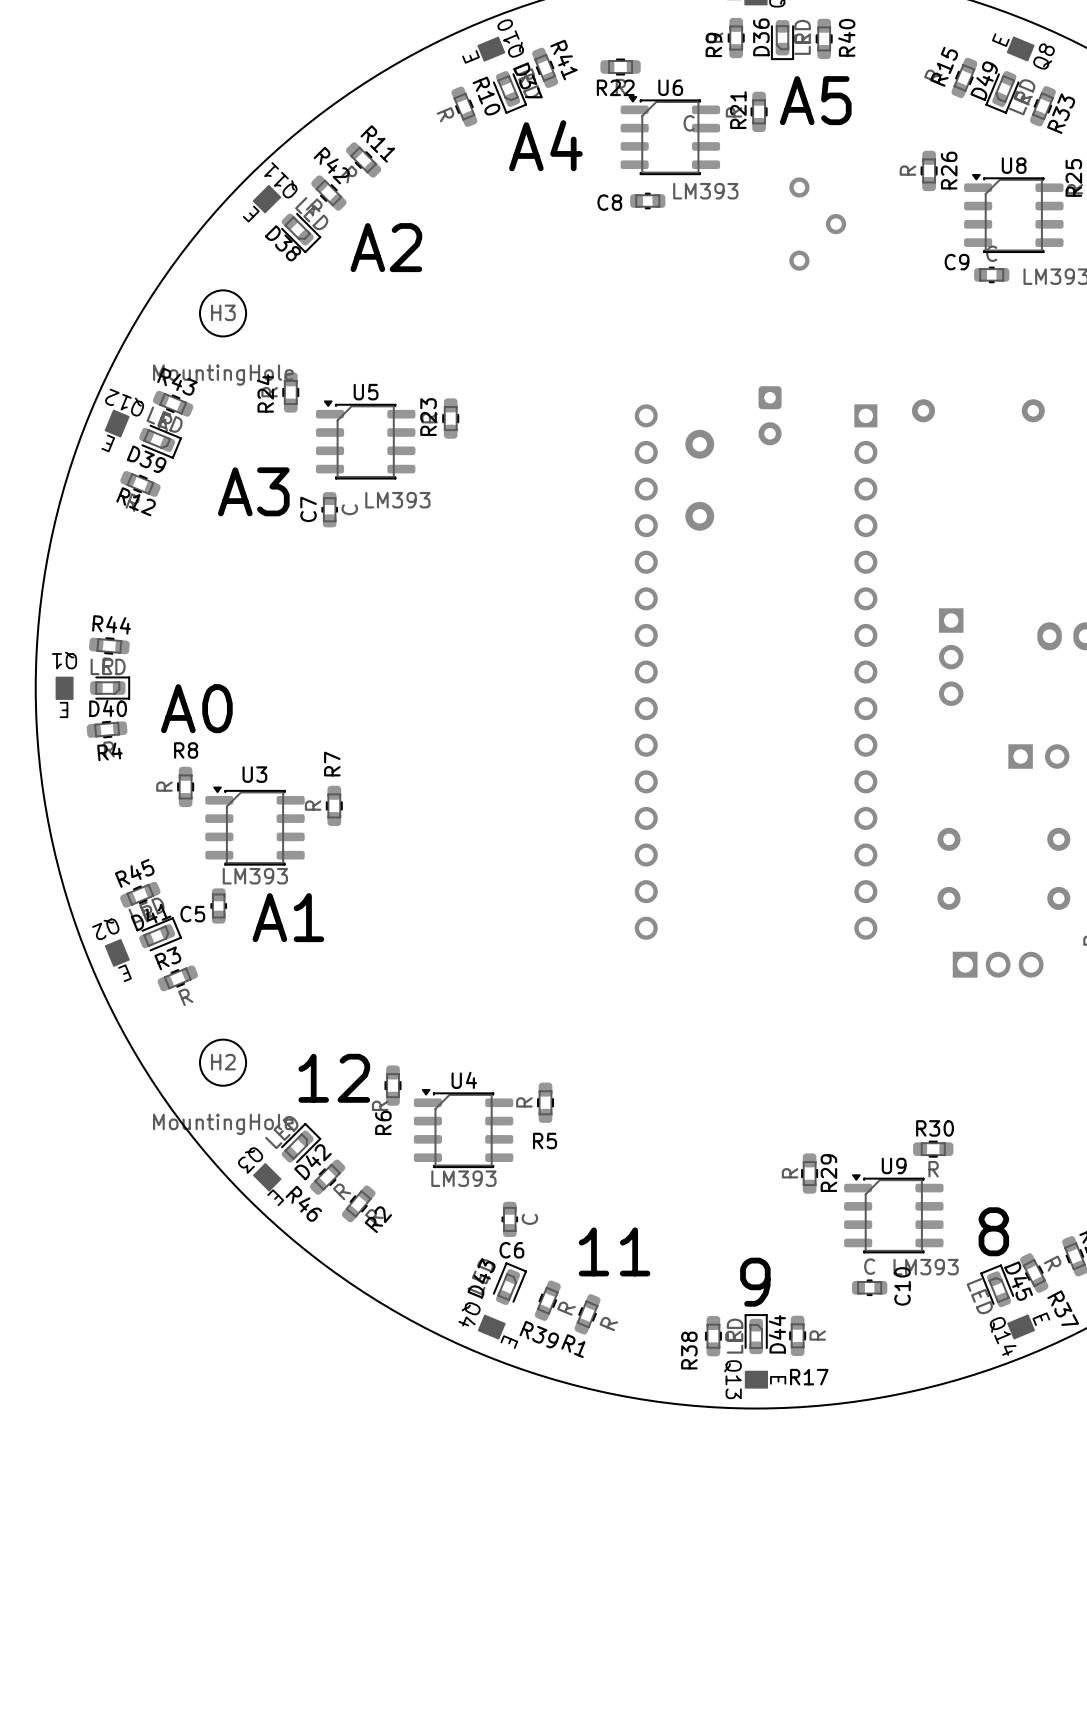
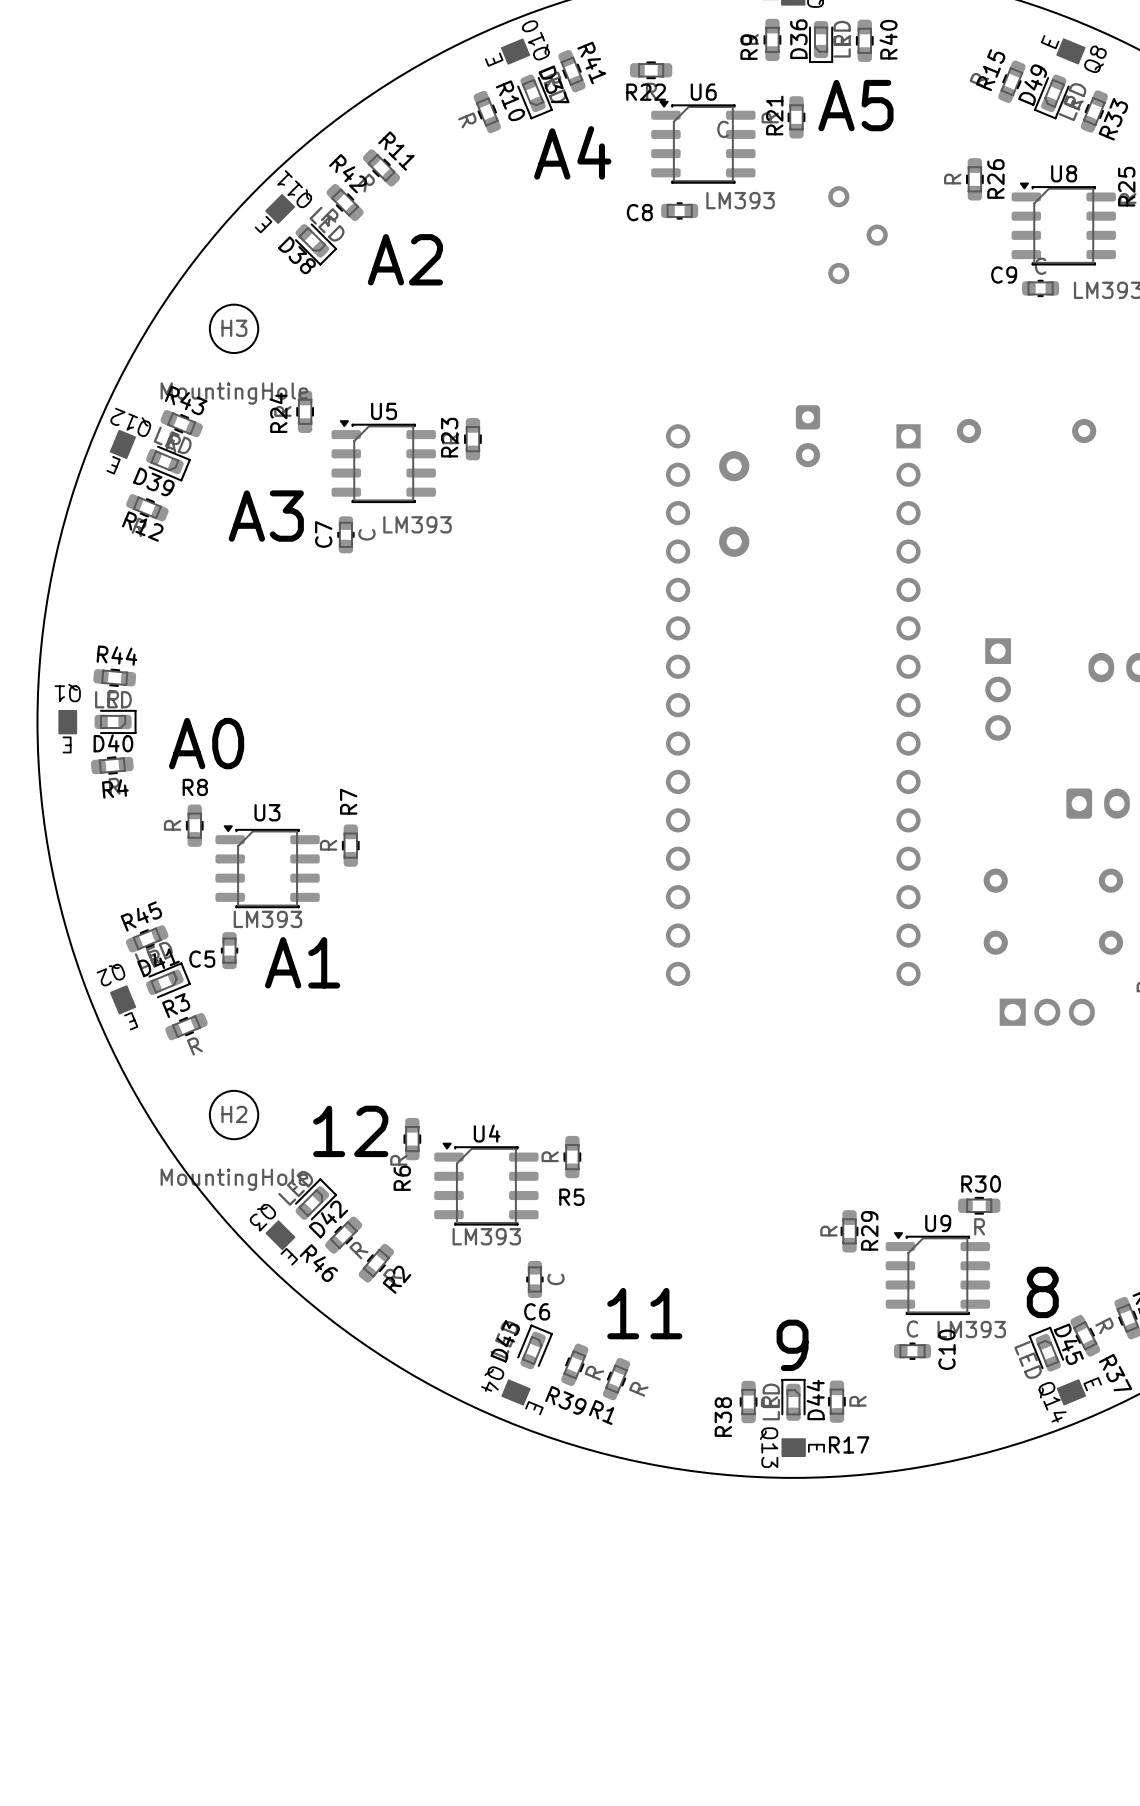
part footprint: [1008, 744, 1070, 769] -> [1066, 788, 1130, 819]

